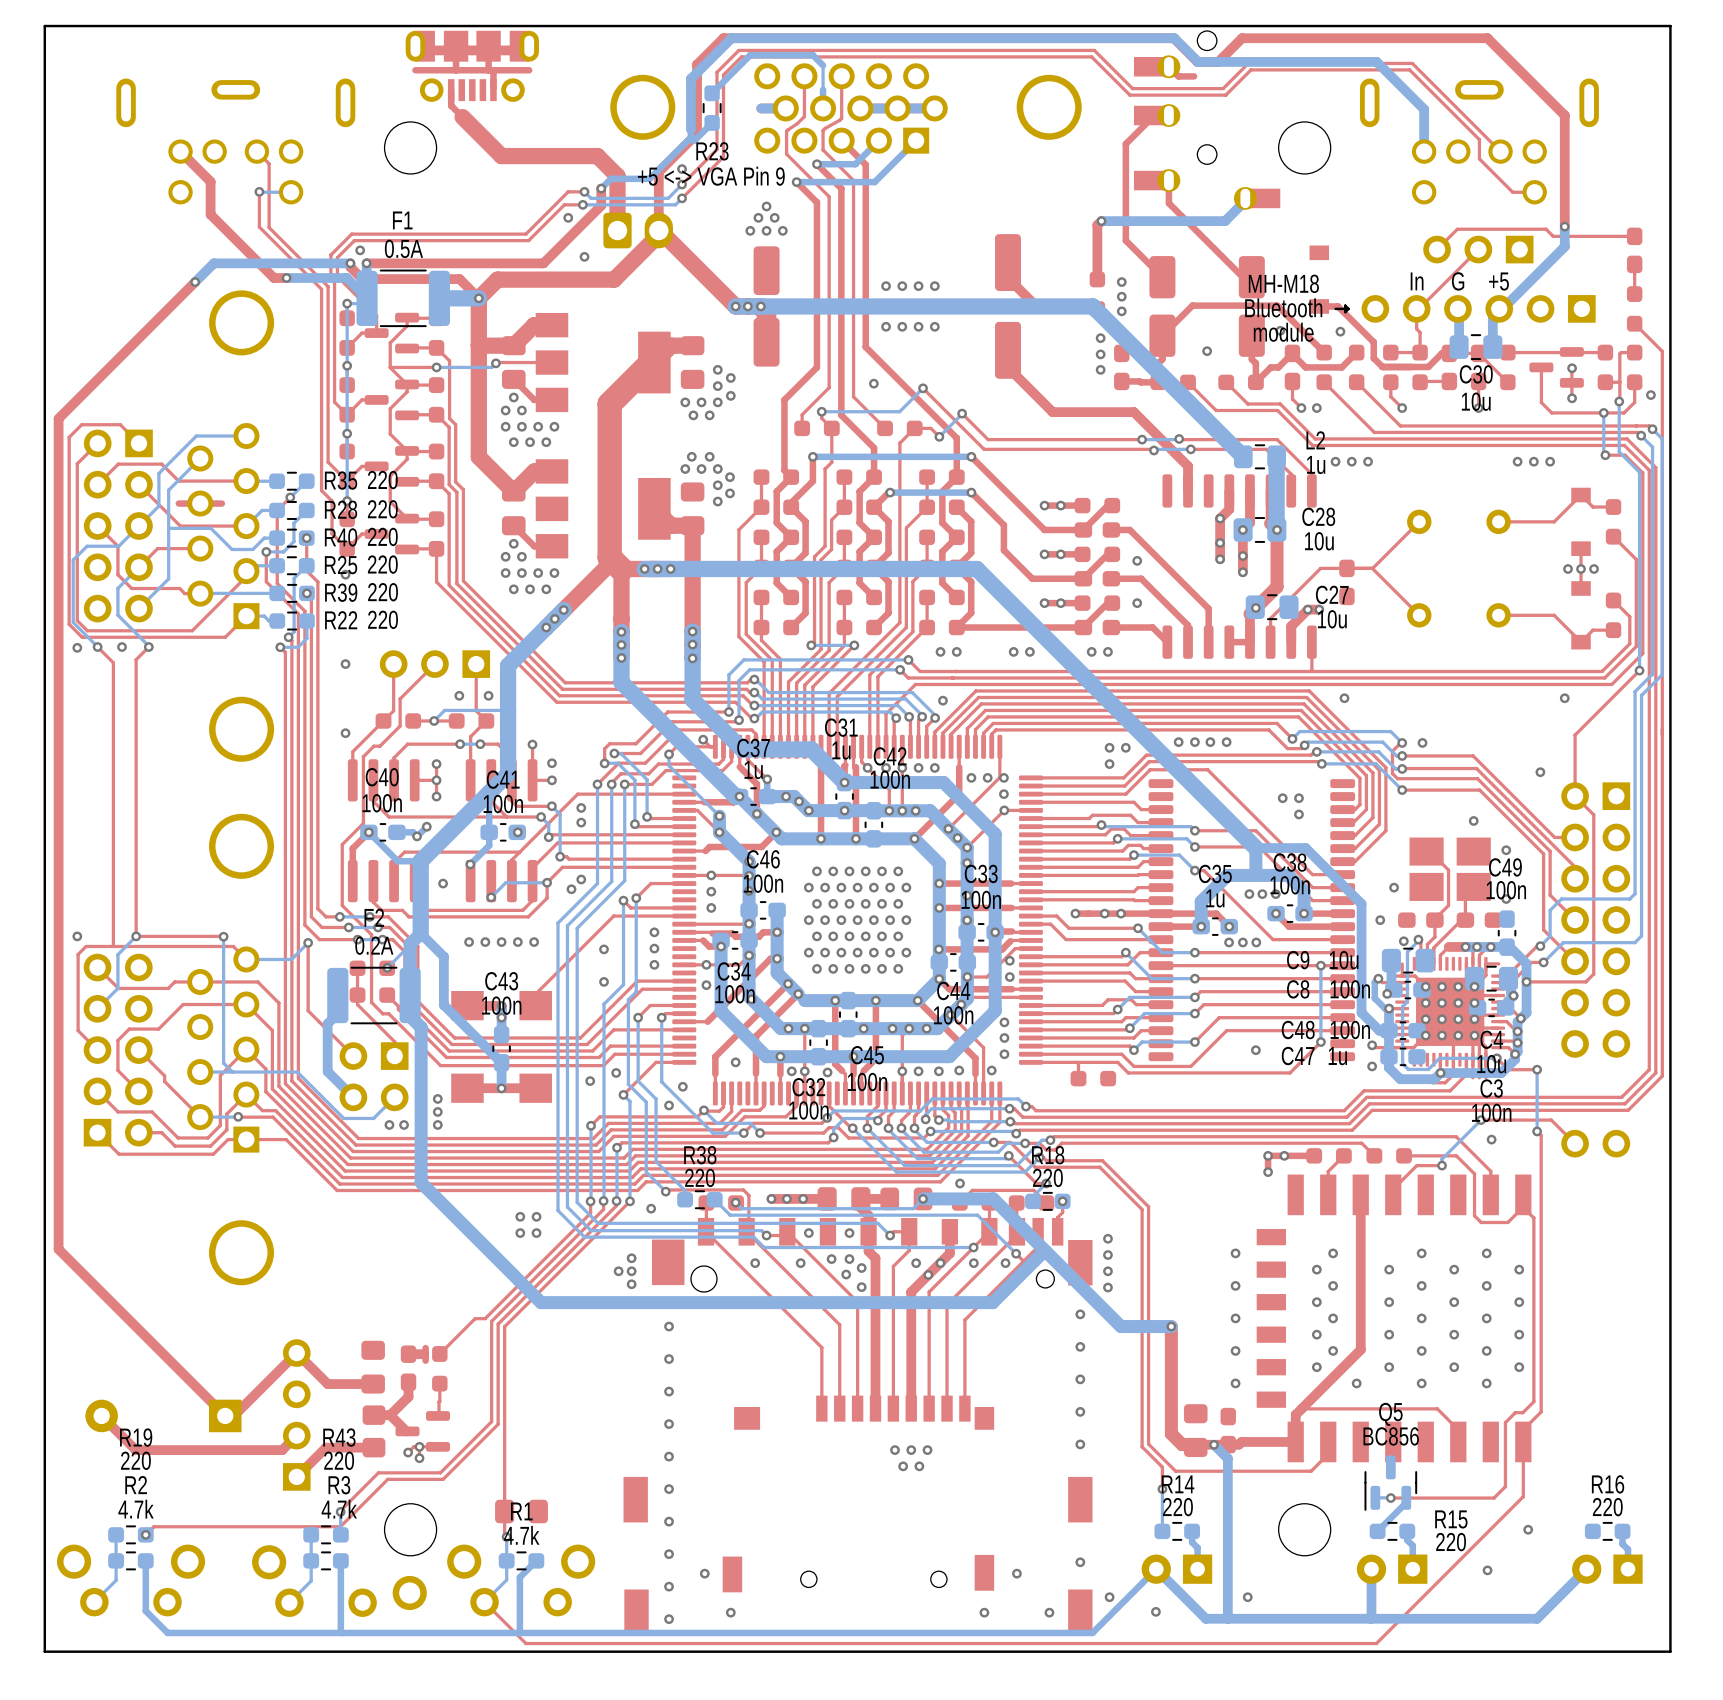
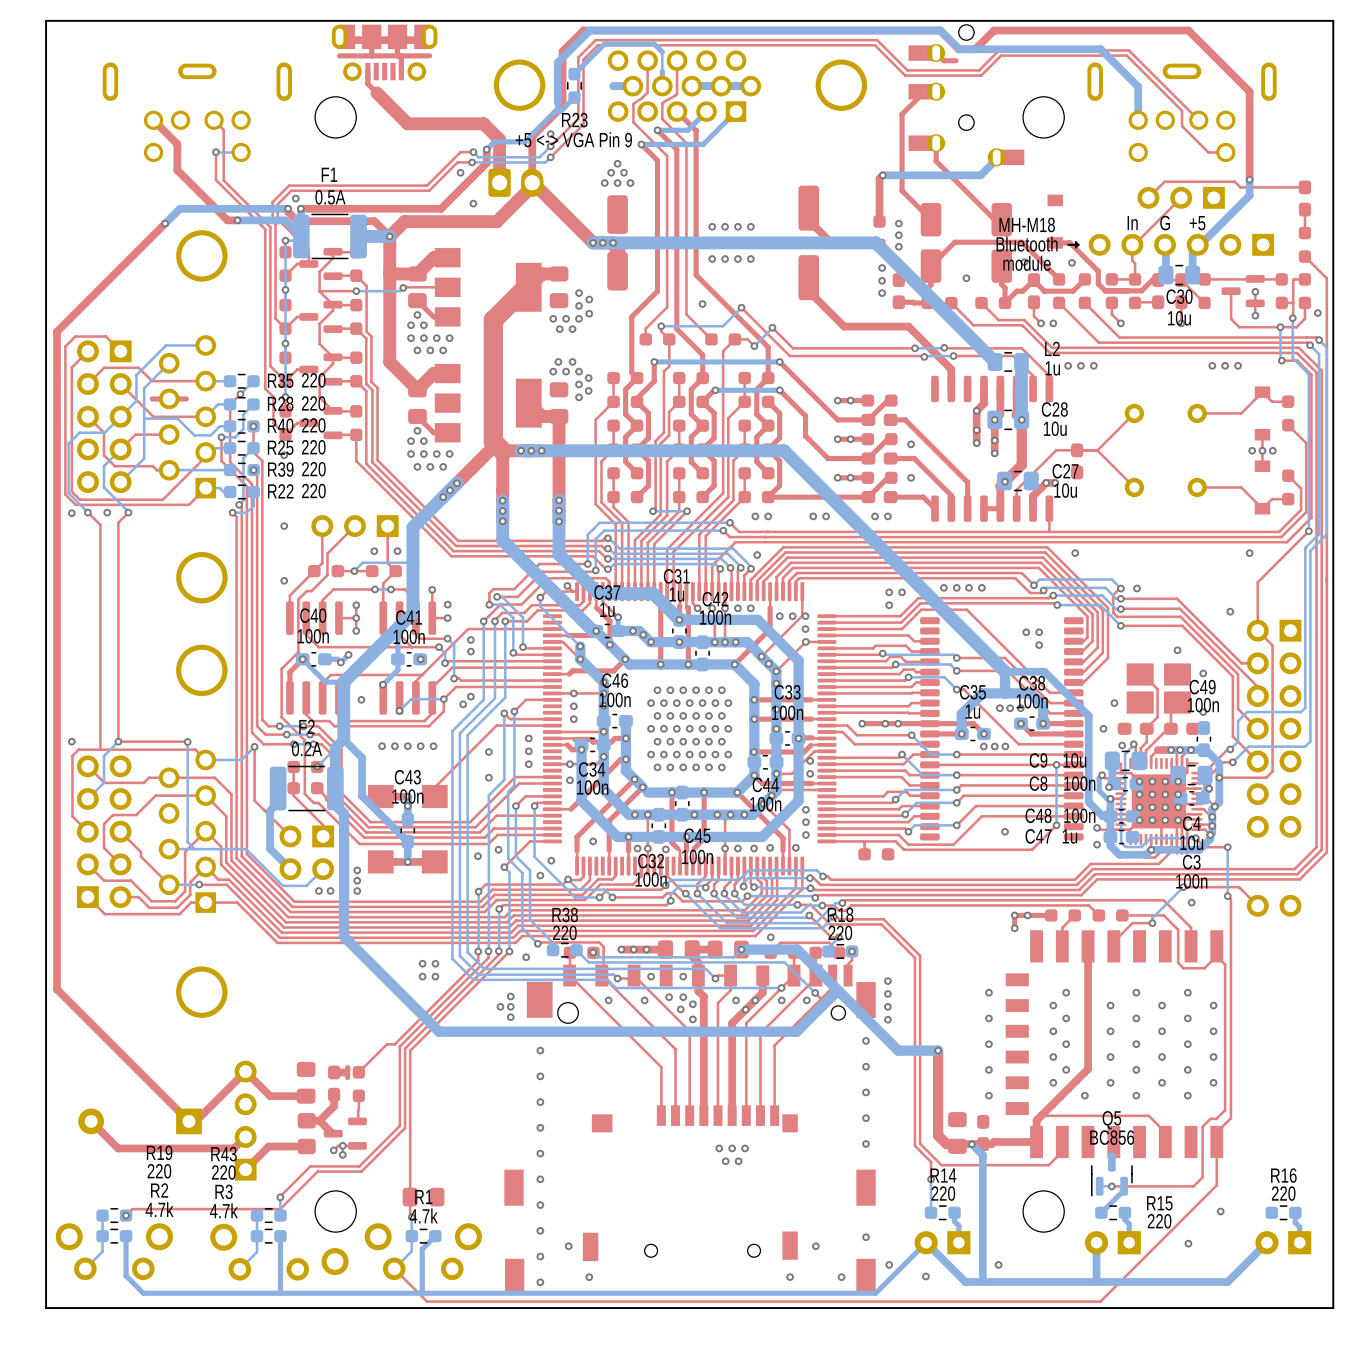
R19 name position: R19 (136, 1437) -> R19 (159, 1152)
R43 name position: R43 (339, 1437) -> R43 (224, 1154)
R19 value position: 220 (135, 1460) -> 220 (159, 1171)
R43 value position: 220 (339, 1460) -> 220 (223, 1172)
R2 name position: R2 (136, 1485) -> R2 (159, 1190)
R3 name position: R3 (339, 1485) -> R3 (224, 1191)
R2 value position: 4.7k (136, 1509) -> 4.7k (159, 1209)
R3 value position: 4.7k (339, 1509) -> 4.7k (223, 1210)

